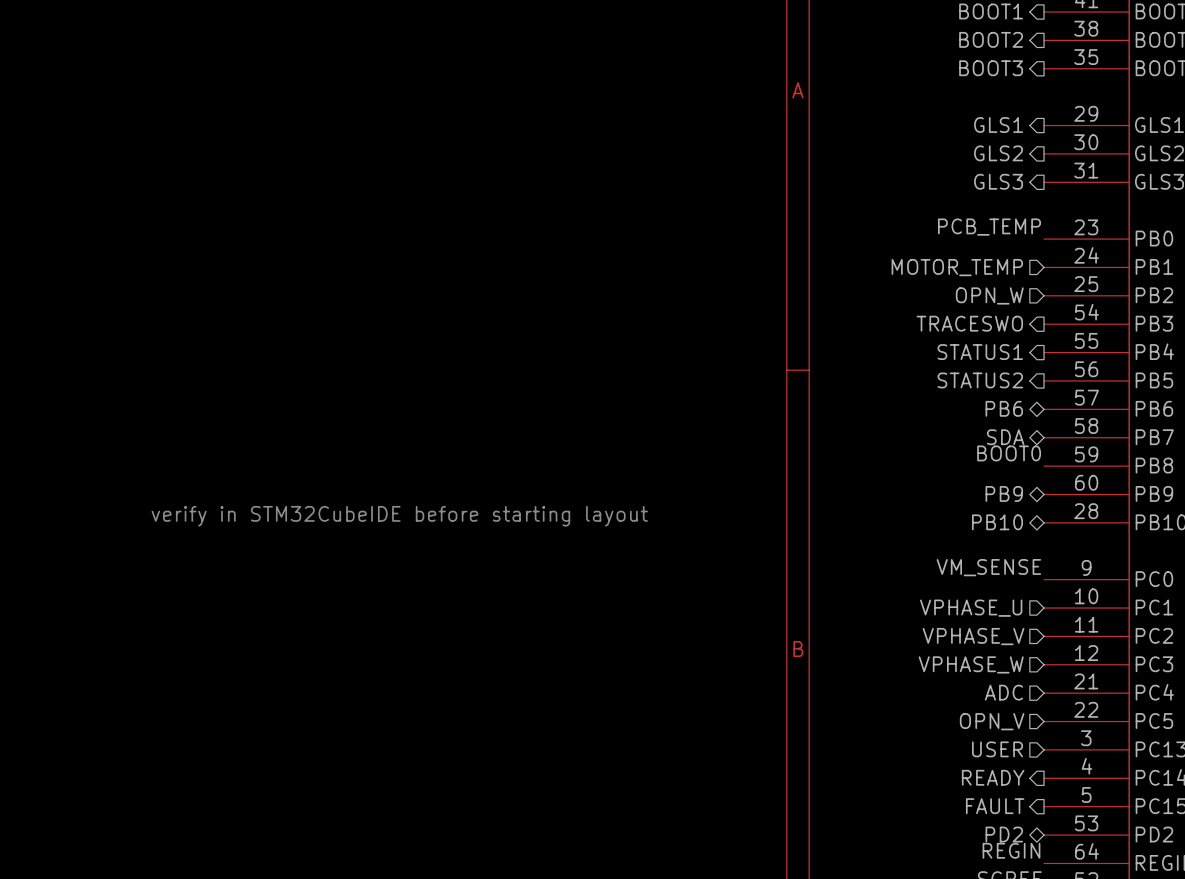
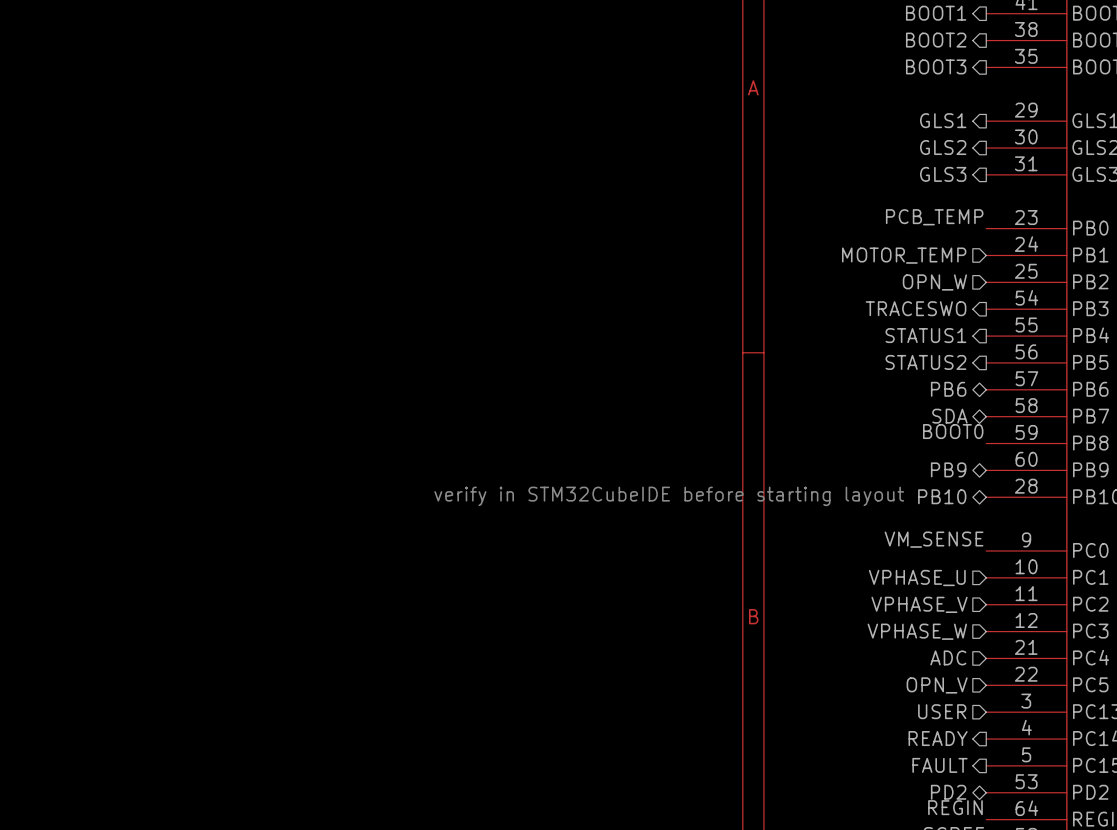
text: verify in STM32CubeIDE before starting layout (399, 516) -> none
text: none -> verify in STM32CubeIDE before starting layout (669, 496)

